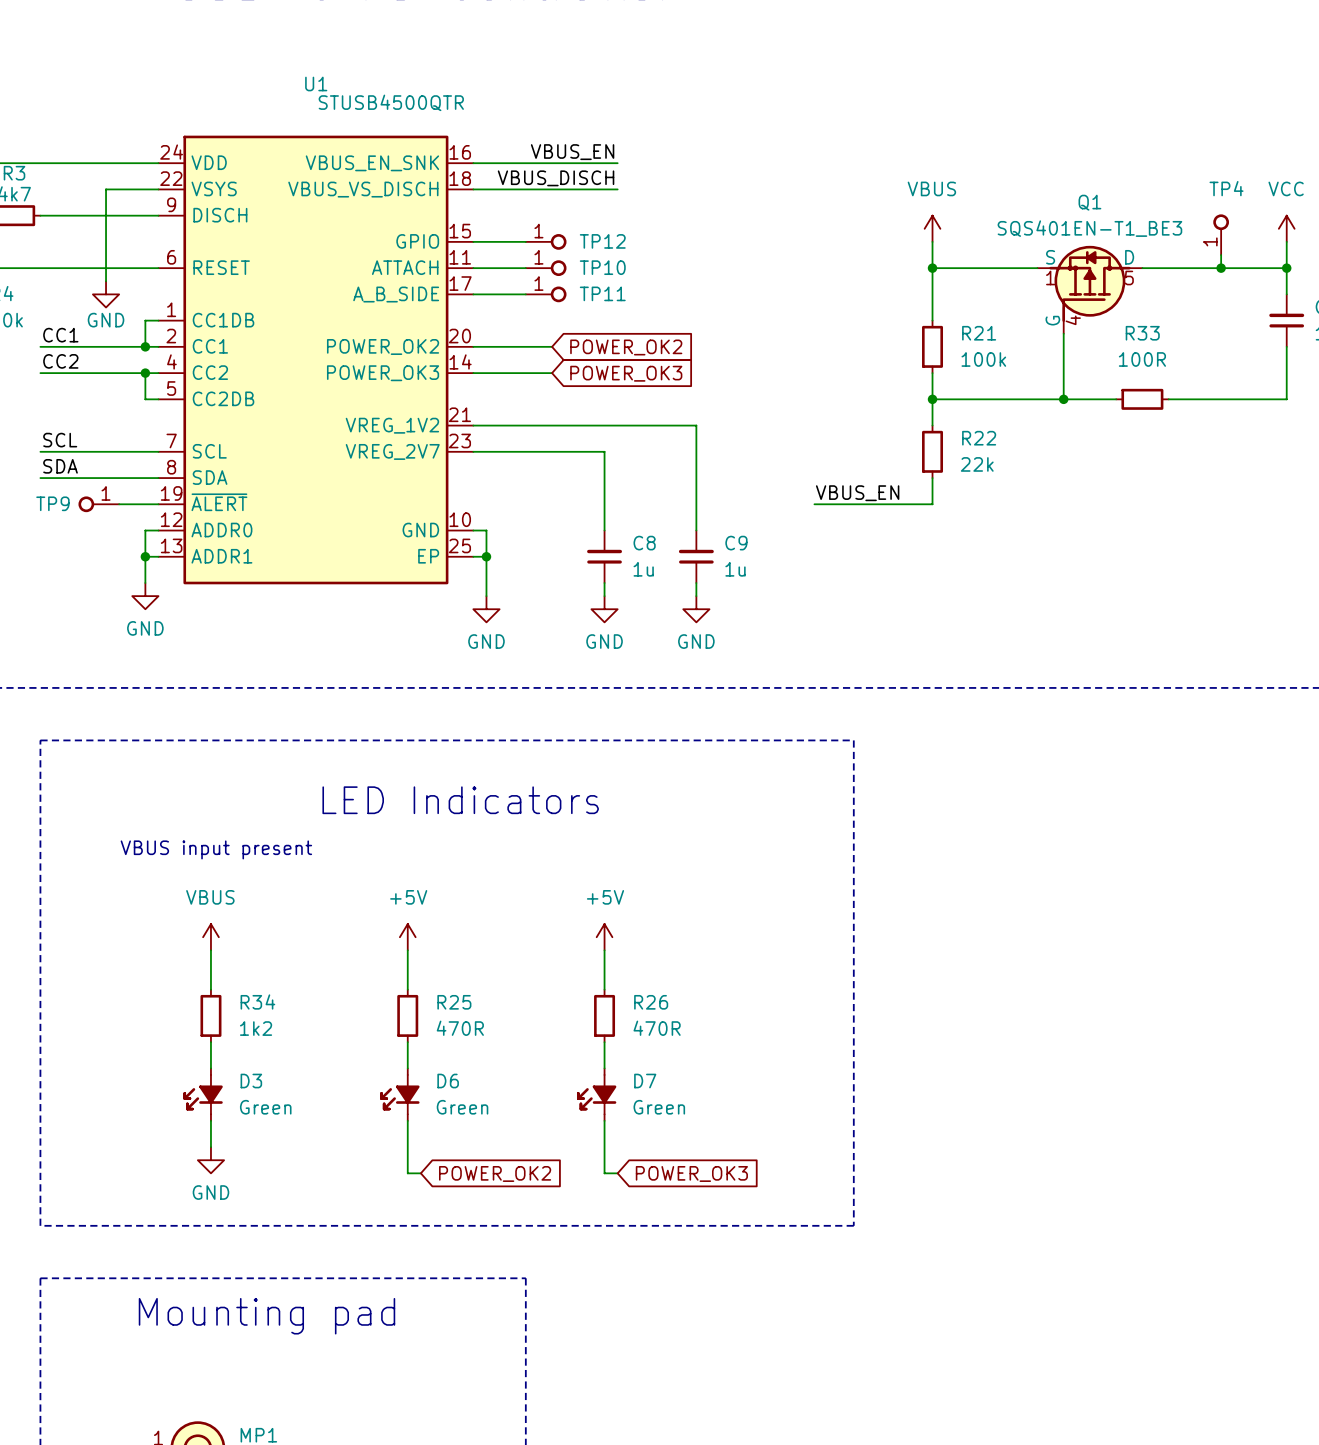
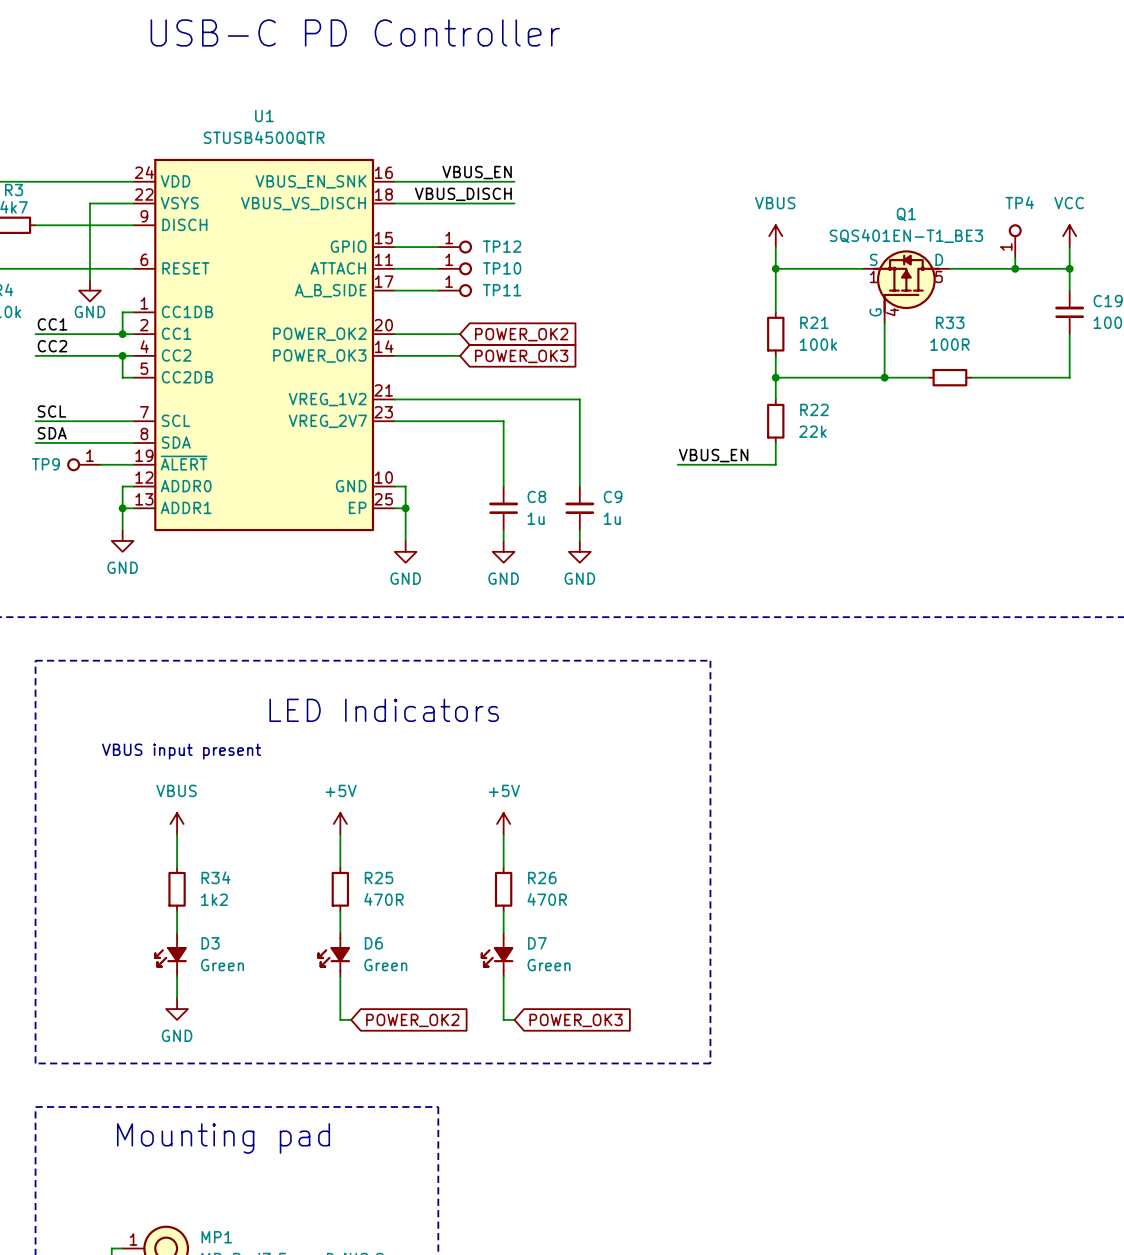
U1 text position: STUSB4500QTR (391, 102) -> STUSB4500QTR (264, 138)

